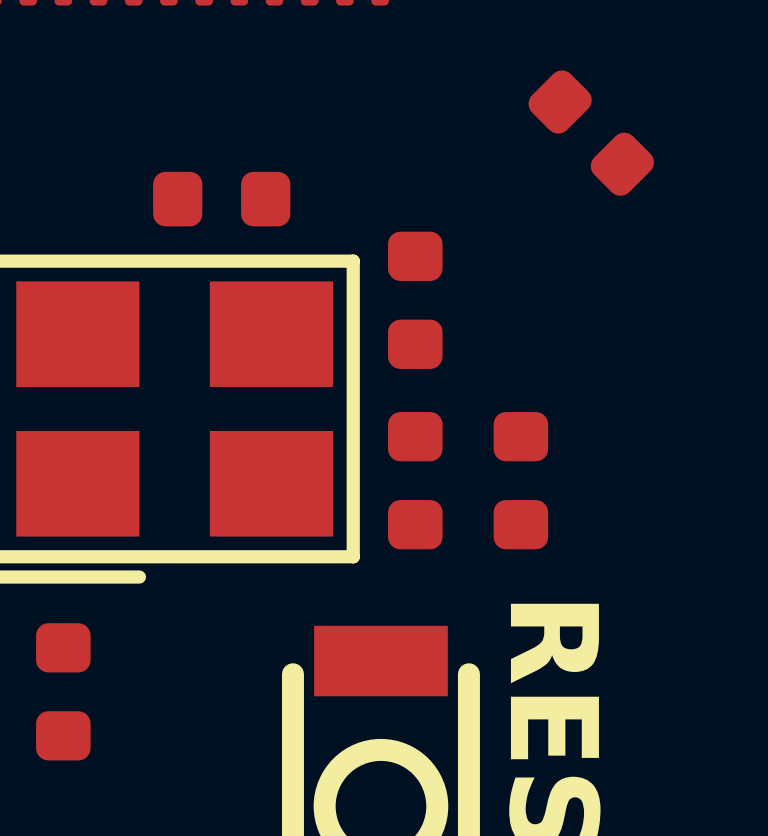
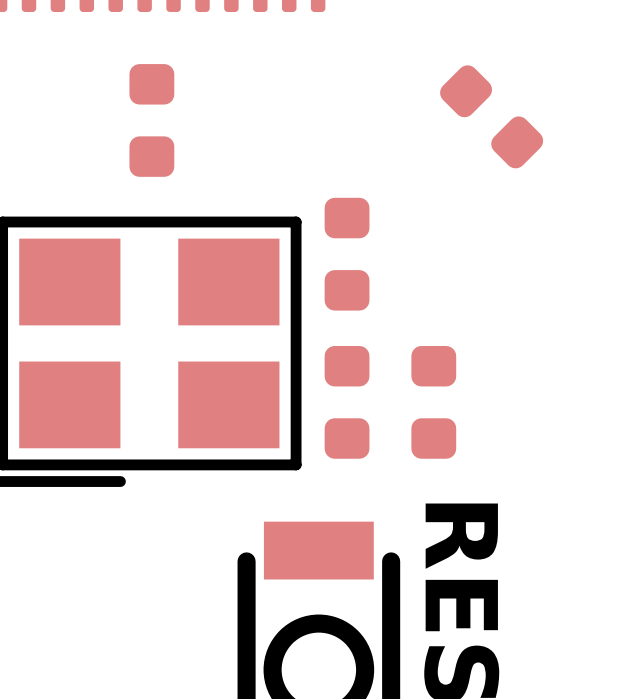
part rotation: 0° (221, 199) -> 90° clockwise (151, 120)
part: (63, 691) -> none

